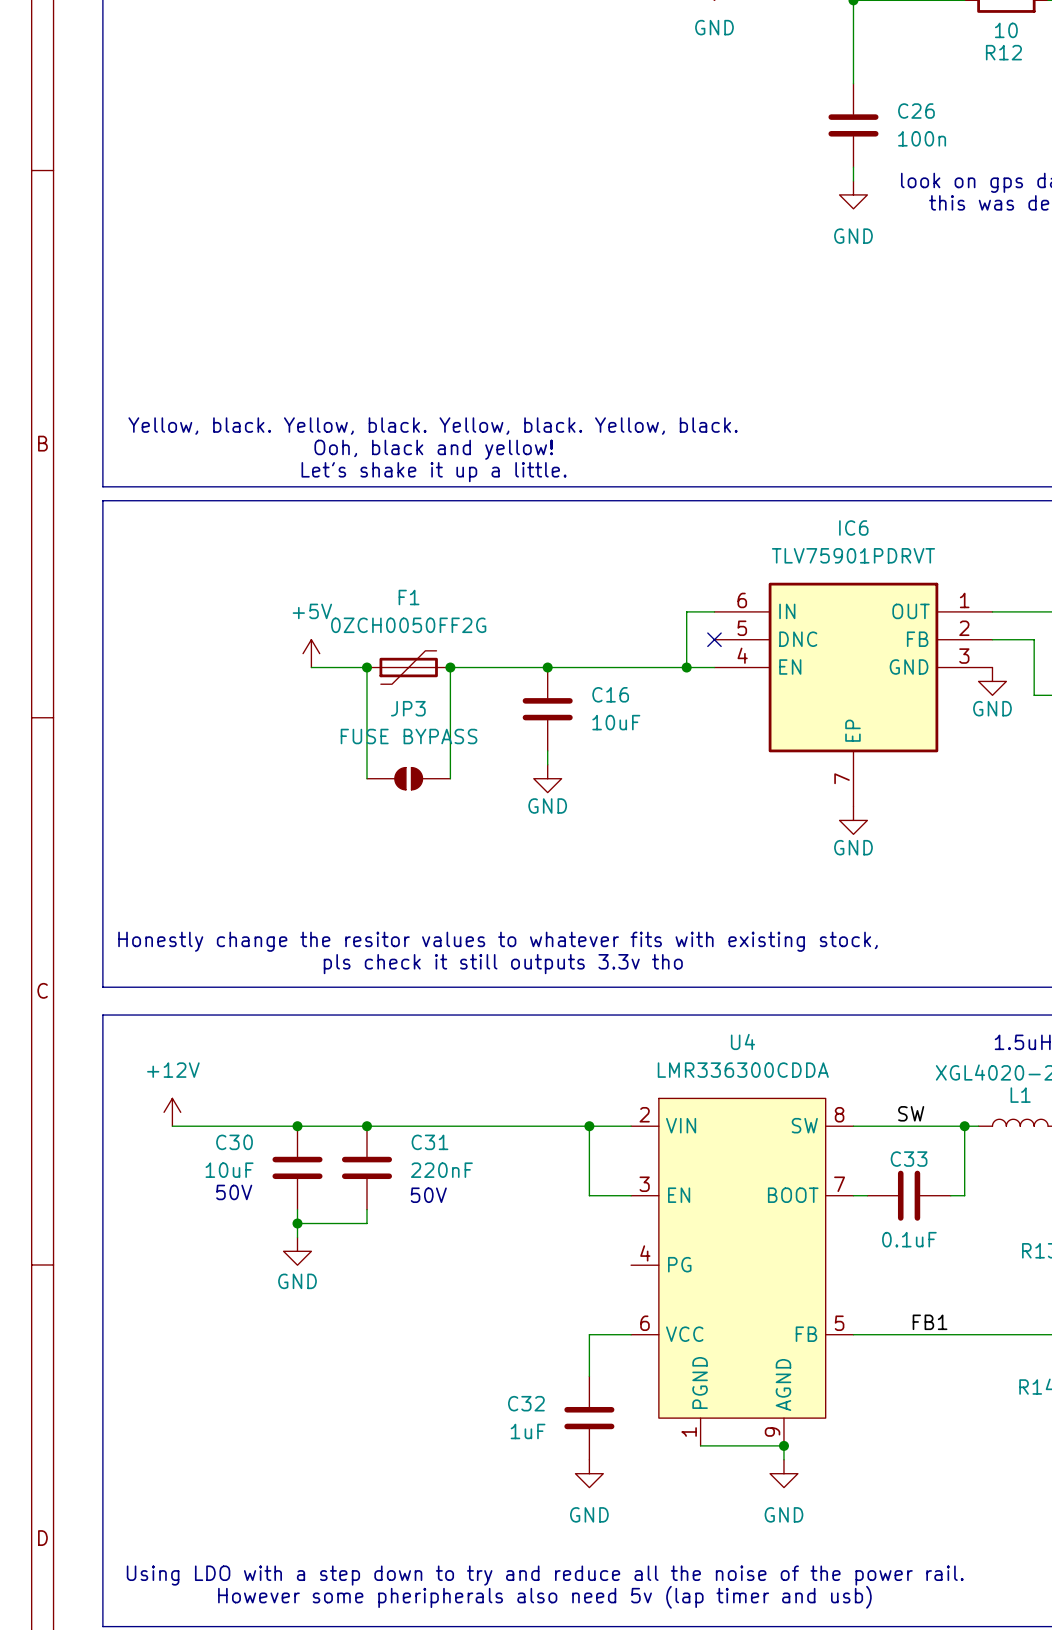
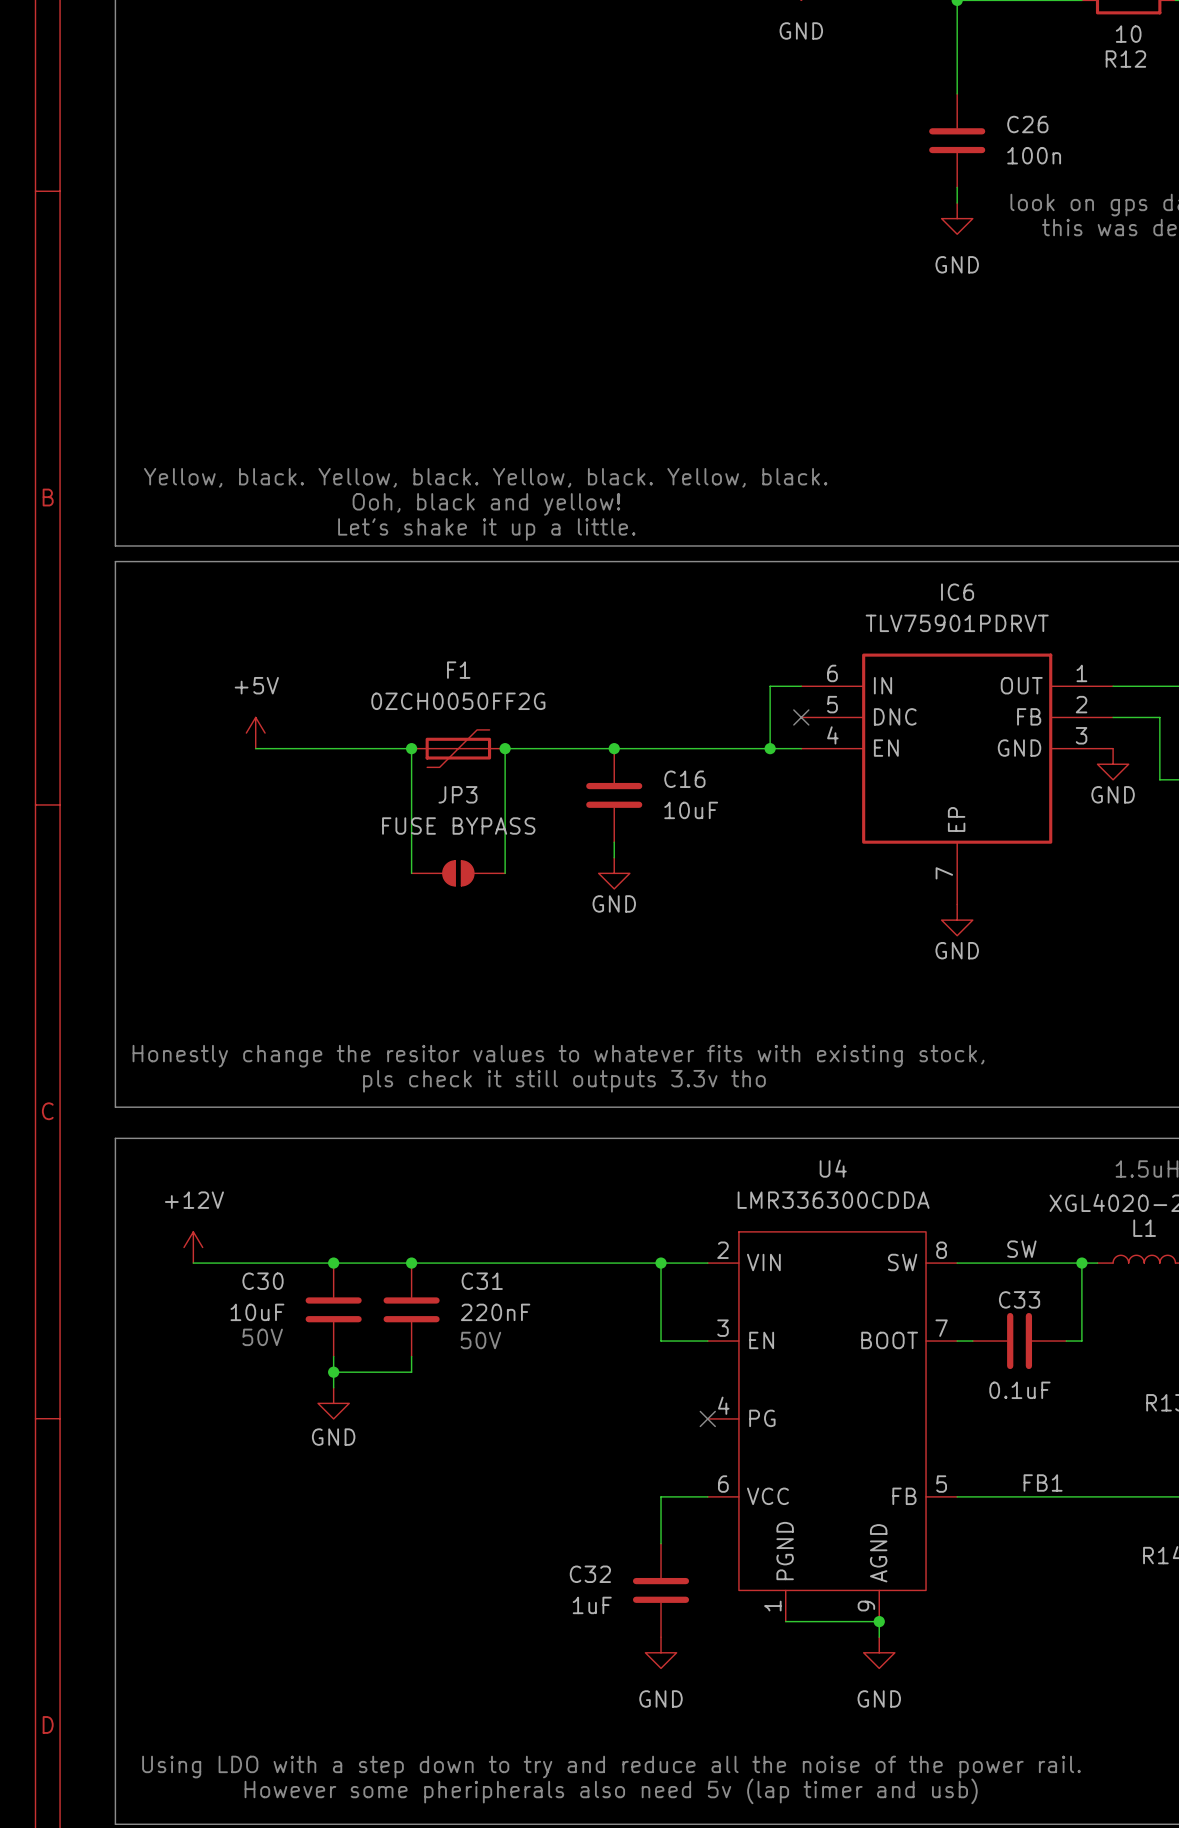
power symbol position: +5V (311, 653) -> +5V (255, 733)
wire: none -> (255, 748) (349, 748)
no-connect mark: none -> (707, 1418)

